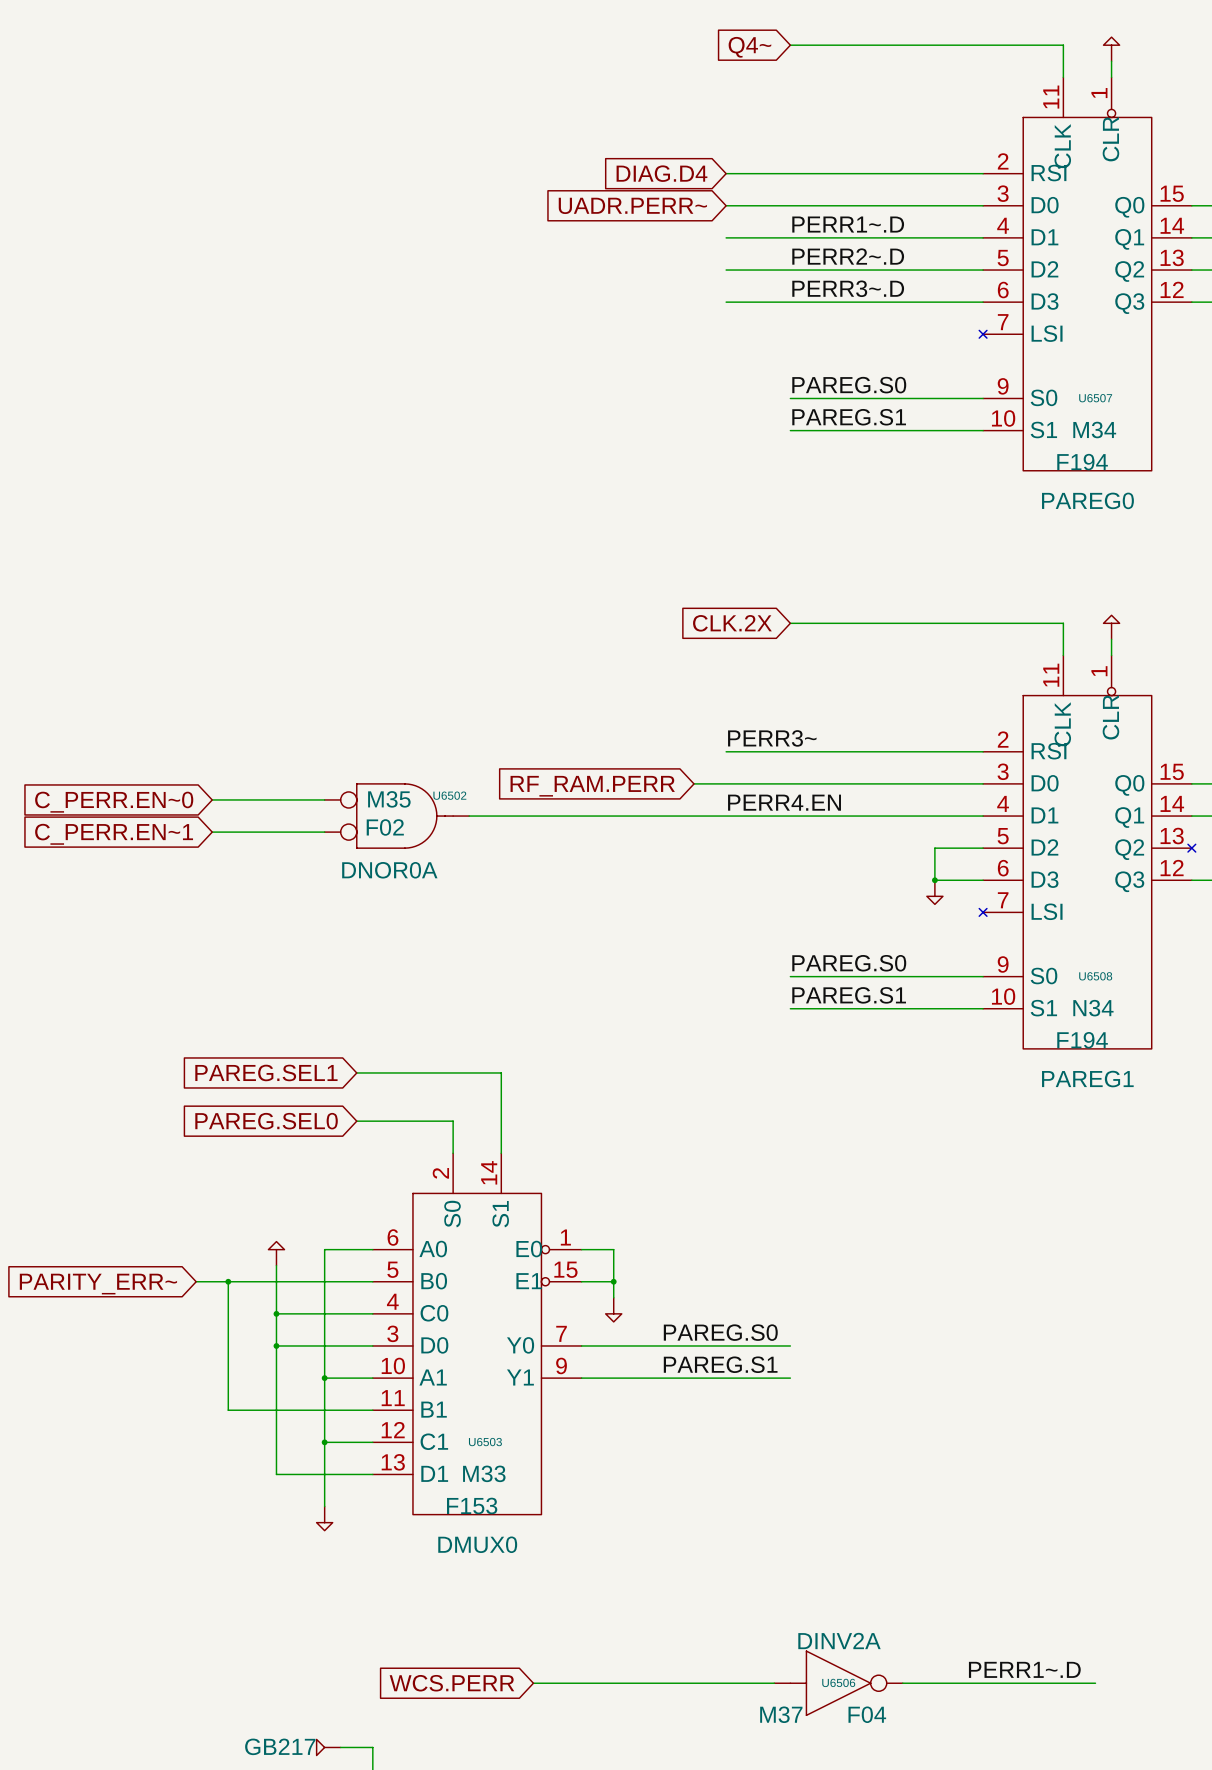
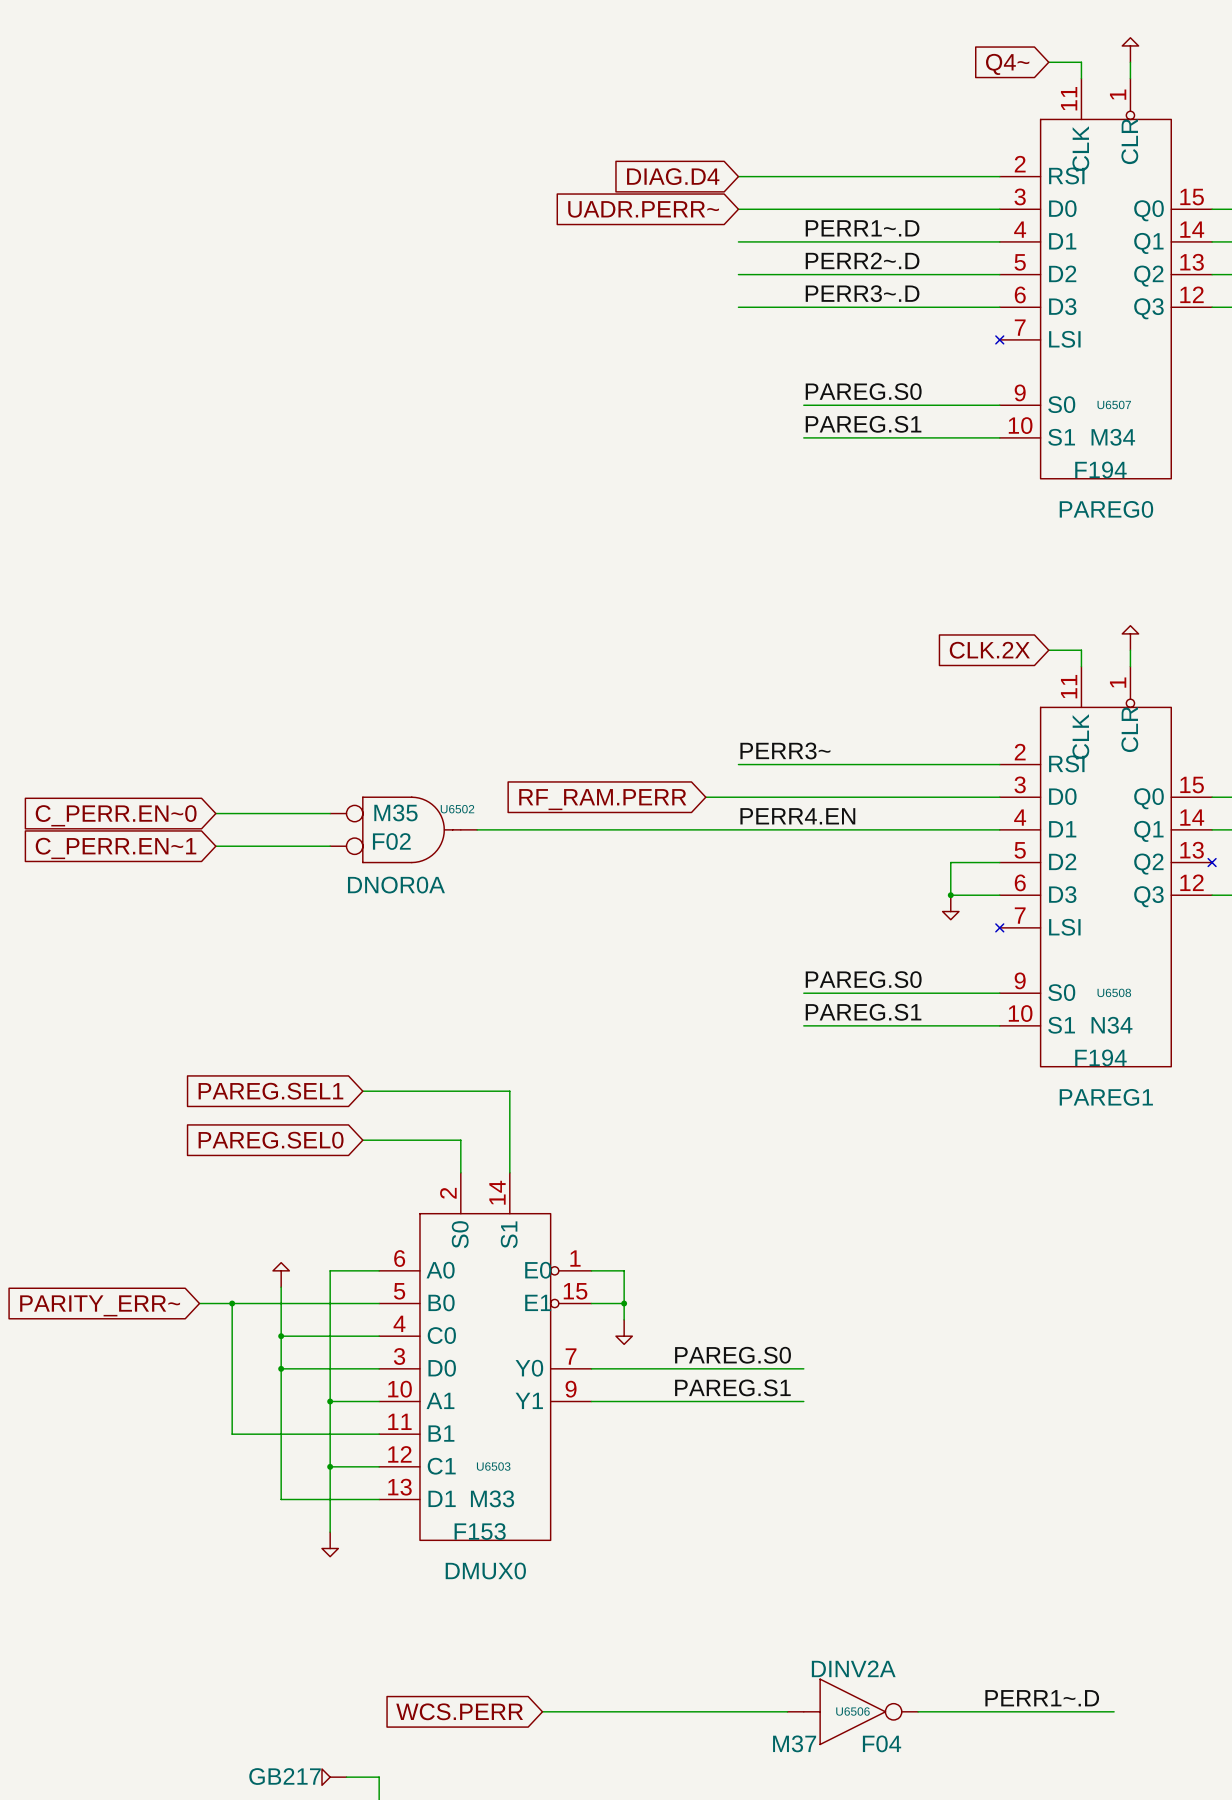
wire: (790, 45) (1063, 45) (1063, 61) -> (1048, 62) (1081, 62)
global label: Q4~ (749, 47) -> none
global label: none -> Q4~ (1007, 64)
global label: CLK.2X (732, 623) -> none
wire: (790, 623) (1063, 623) (1063, 639) -> (1048, 650) (1081, 650)
global label: none -> CLK.2X (989, 650)

